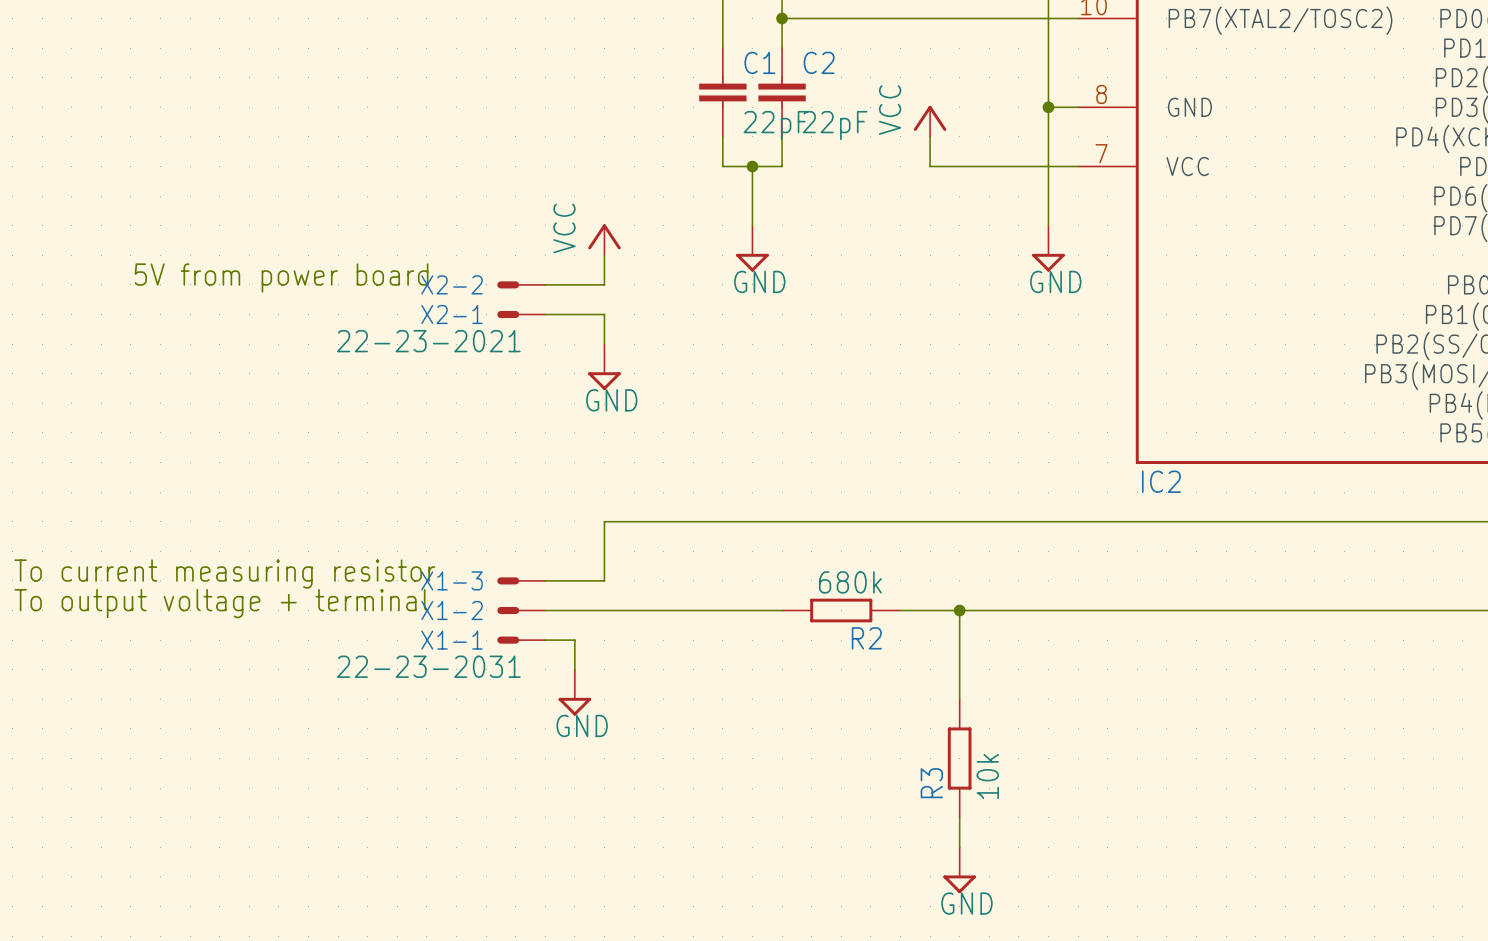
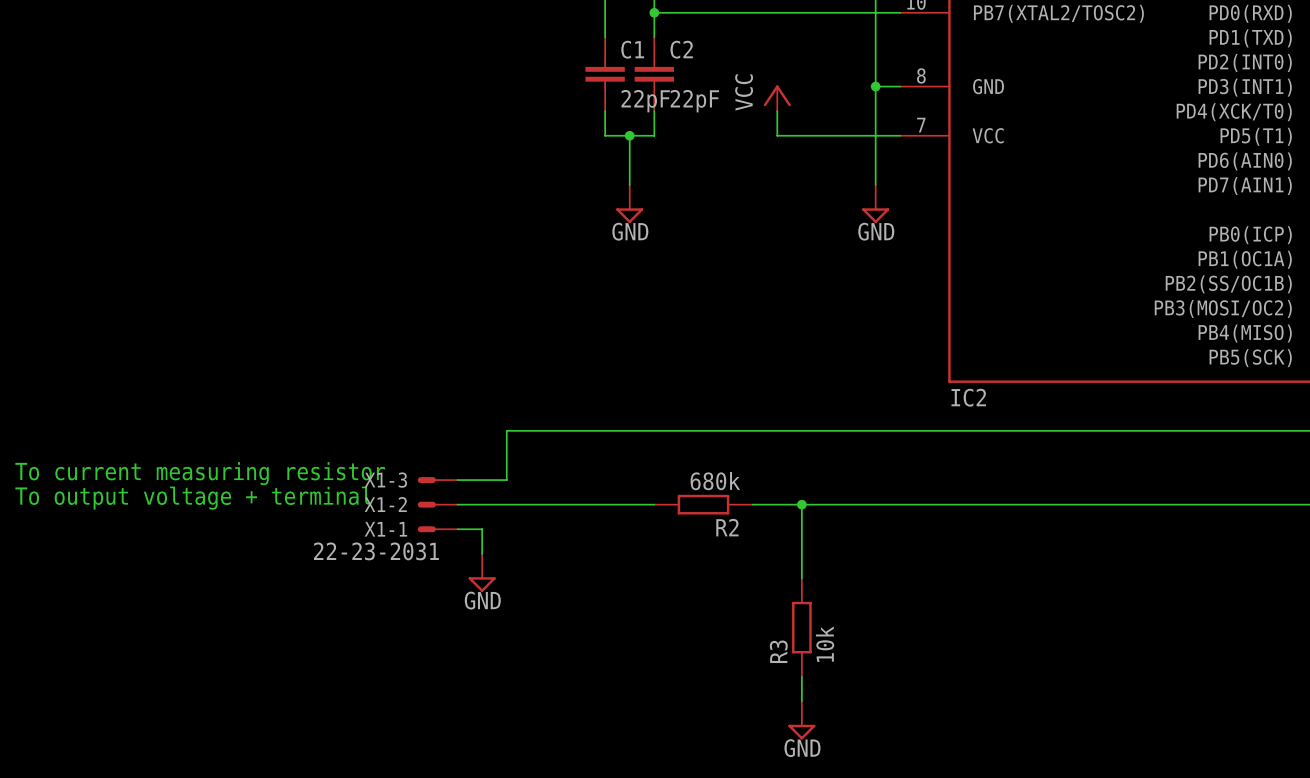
power symbol: VCC (604, 239) -> none
wire: (604, 255) (604, 284) (545, 284) -> none
text: 5V from power board (281, 277) -> none
X2-2: (521, 284) -> none
X2-1: 22-23-2021 (521, 314) -> none
wire: (545, 314) (604, 314) (604, 344) -> none
power symbol: GND (604, 367) -> none

